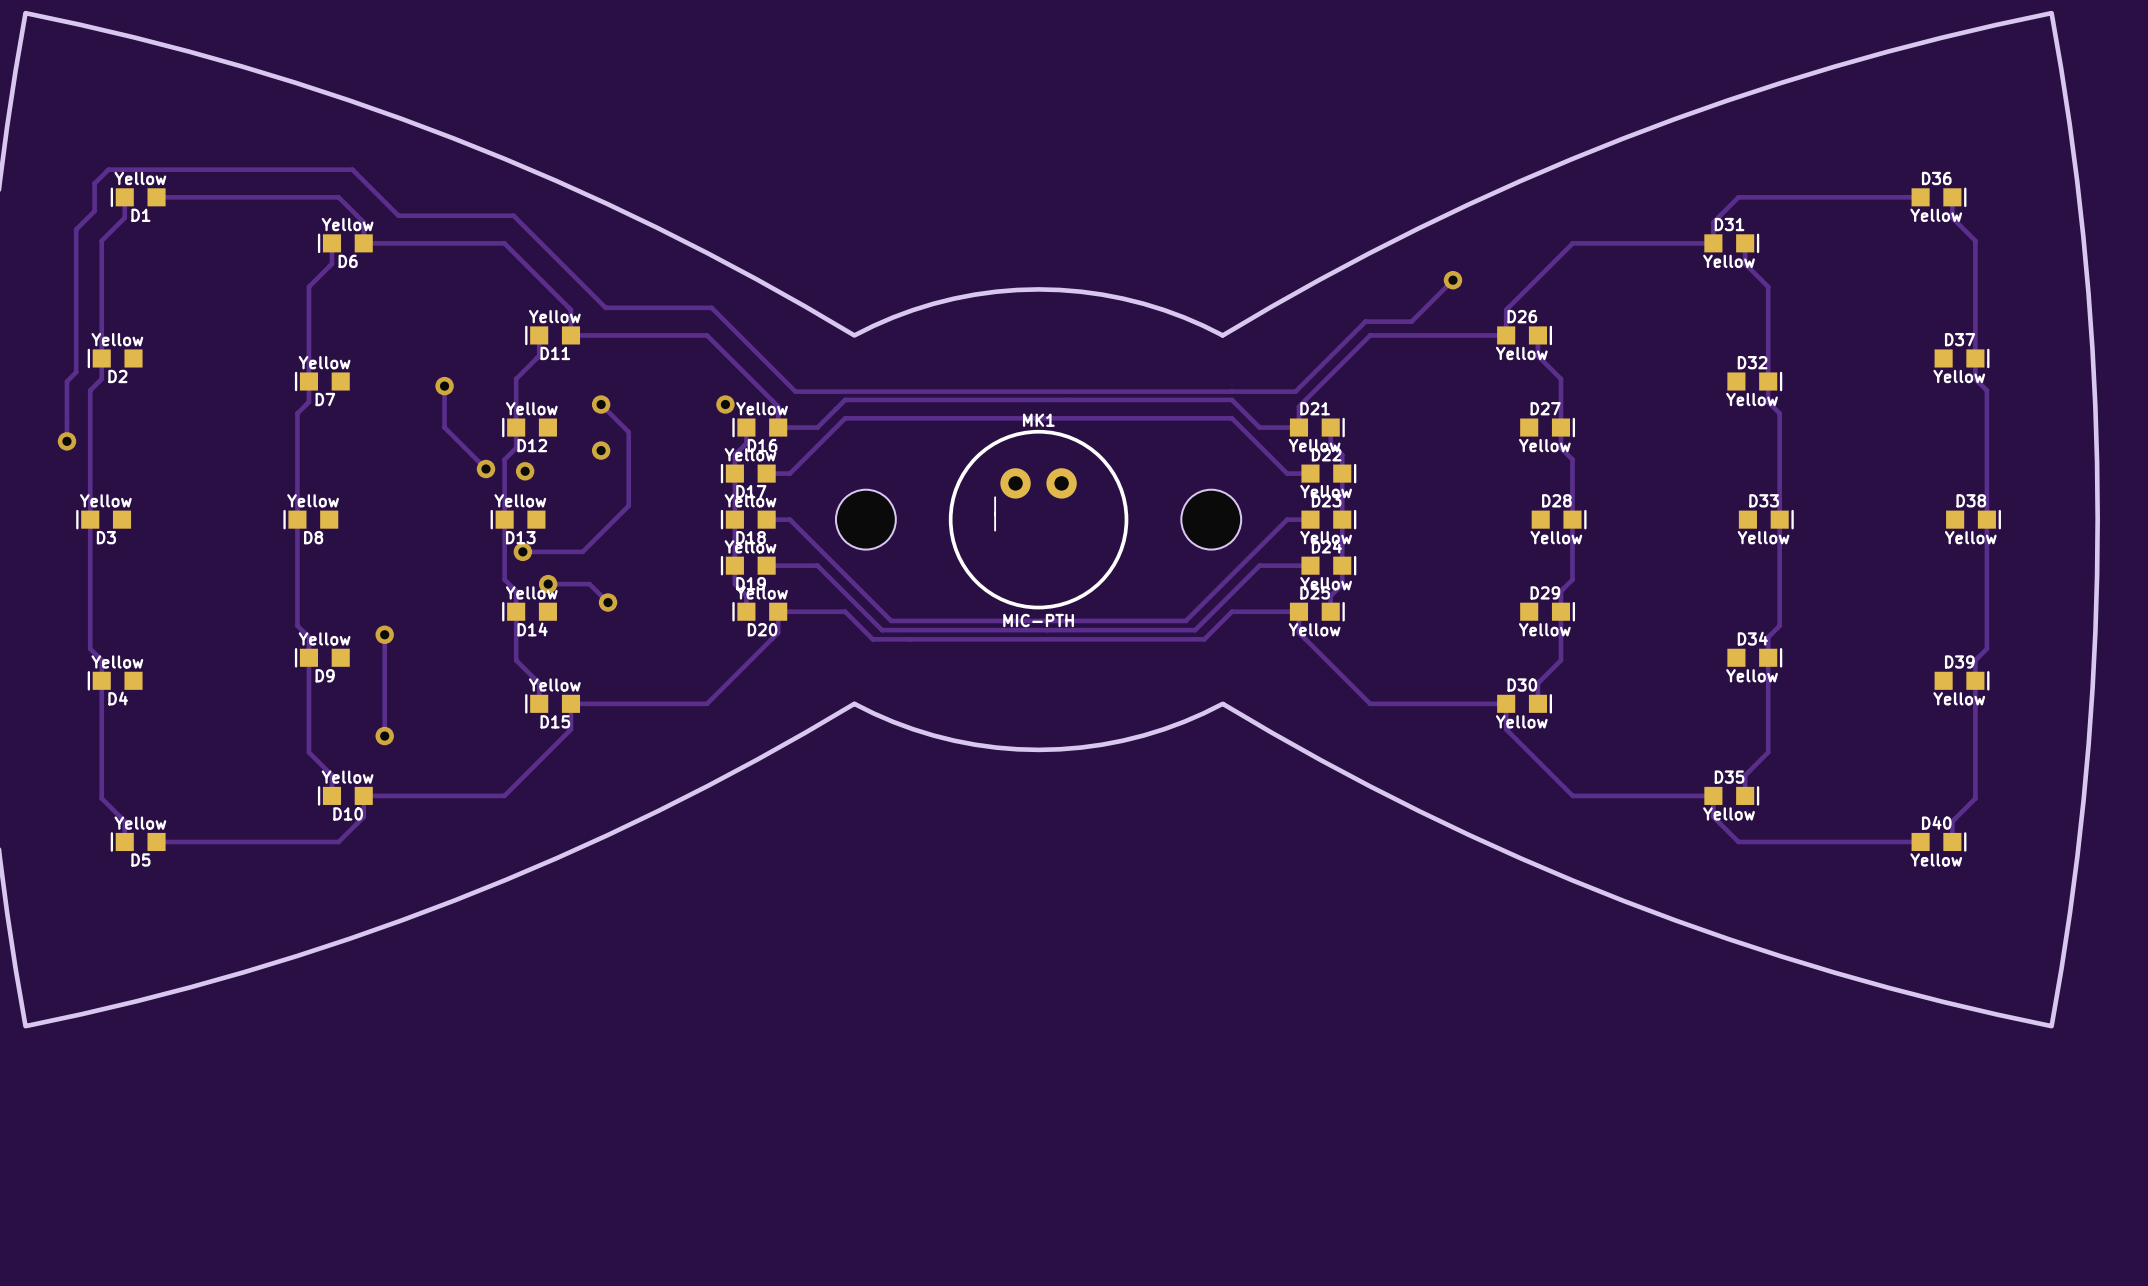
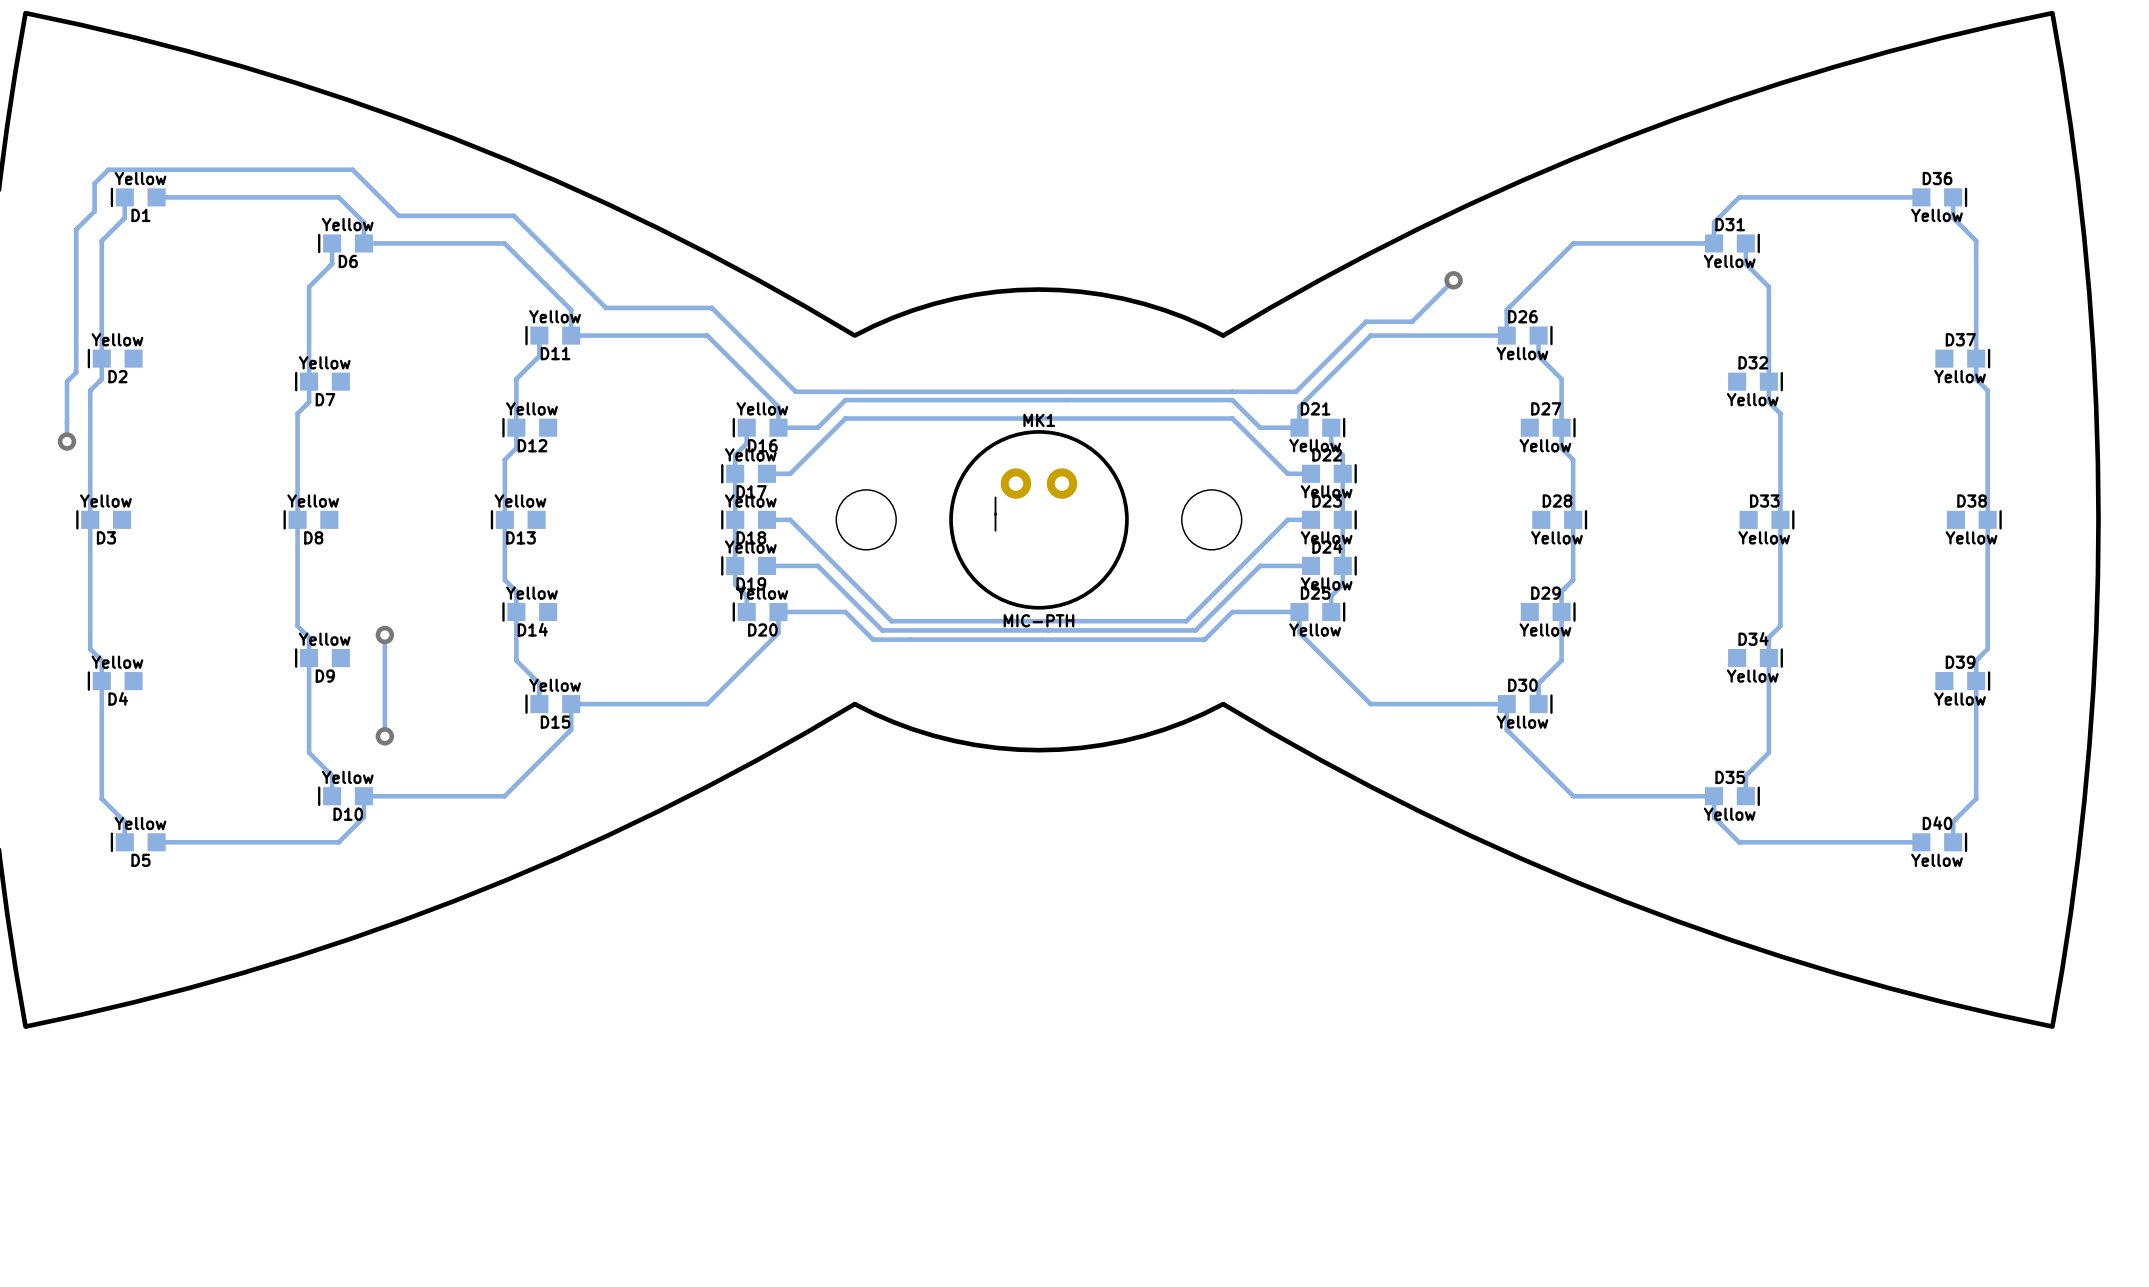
track: (444, 386) (444, 427) (486, 468) -> none
via: (444, 386) -> none
track: (601, 404) (628, 432) (628, 505) (582, 551) (522, 551) -> none
via: (601, 404) -> none
via: (725, 404) -> none
via: (601, 450) -> none
via: (486, 468) -> none
via: (525, 471) -> none
via: (522, 551) -> none
track: (548, 584) (589, 584) (608, 602) -> none
via: (548, 584) -> none
via: (608, 602) -> none

